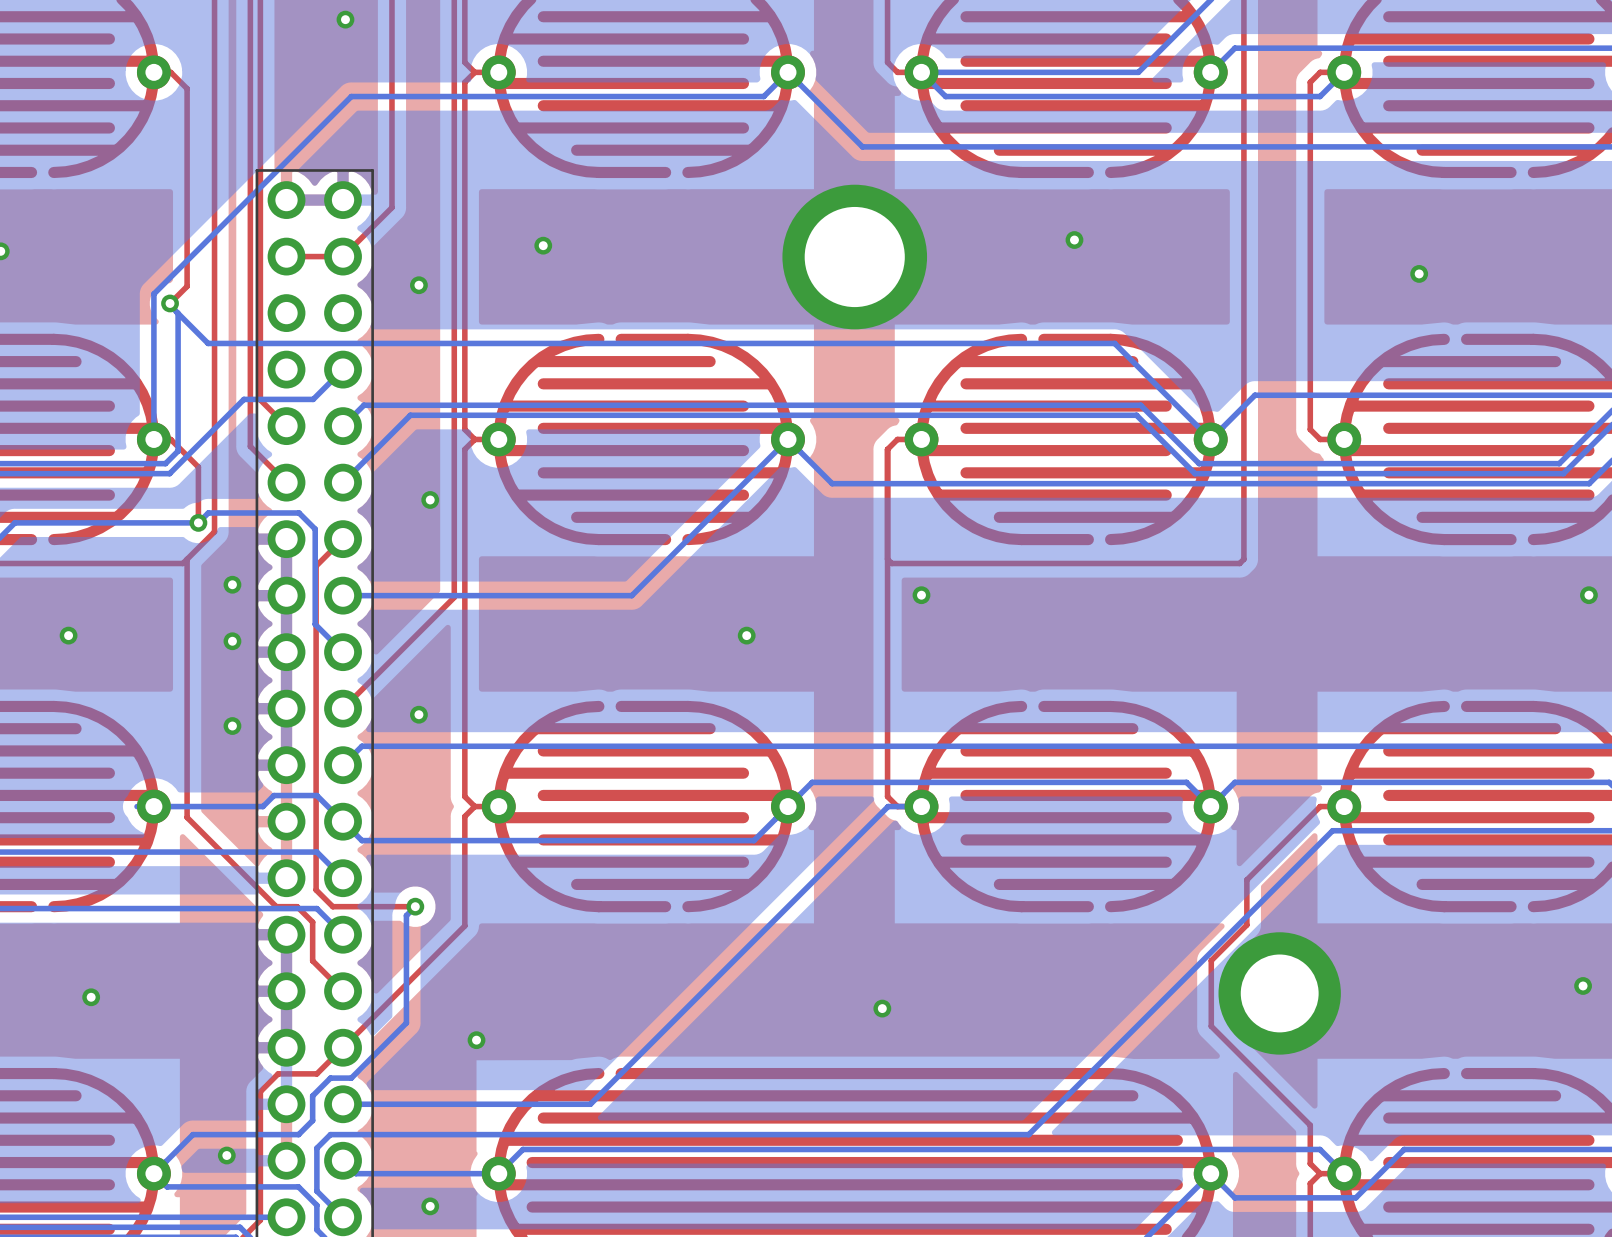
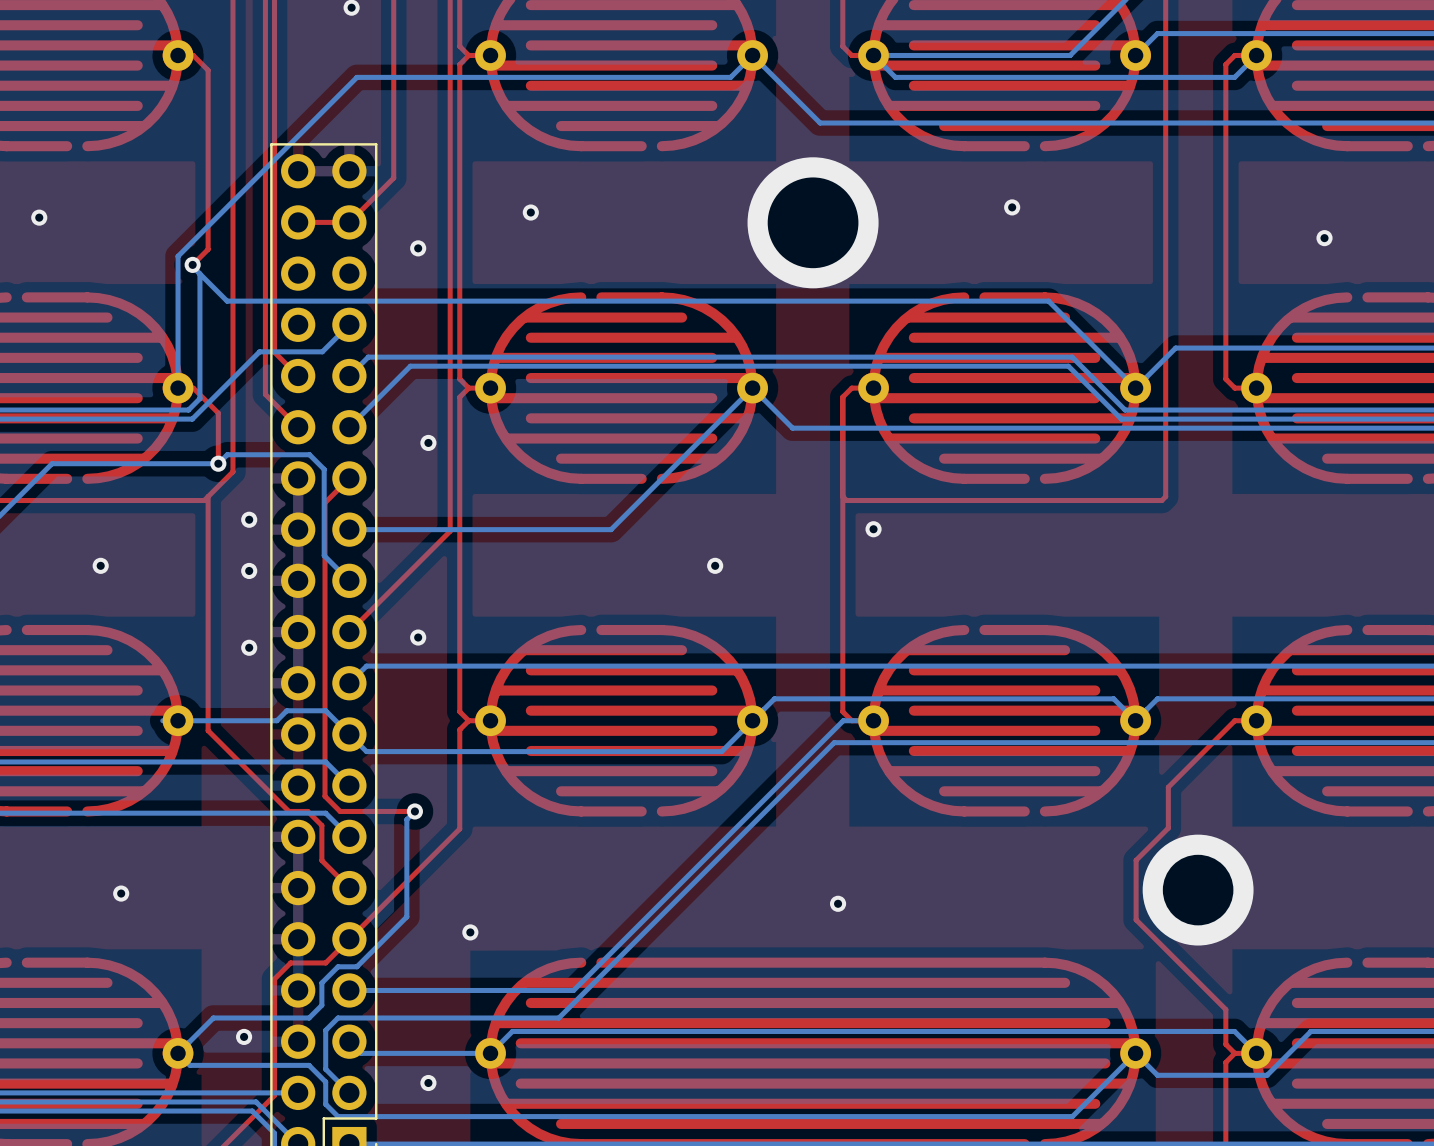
bottom track: (1332, 830) (1028, 1134) (574, 1134) -> (1246, 742) (834, 742) (558, 1018)

